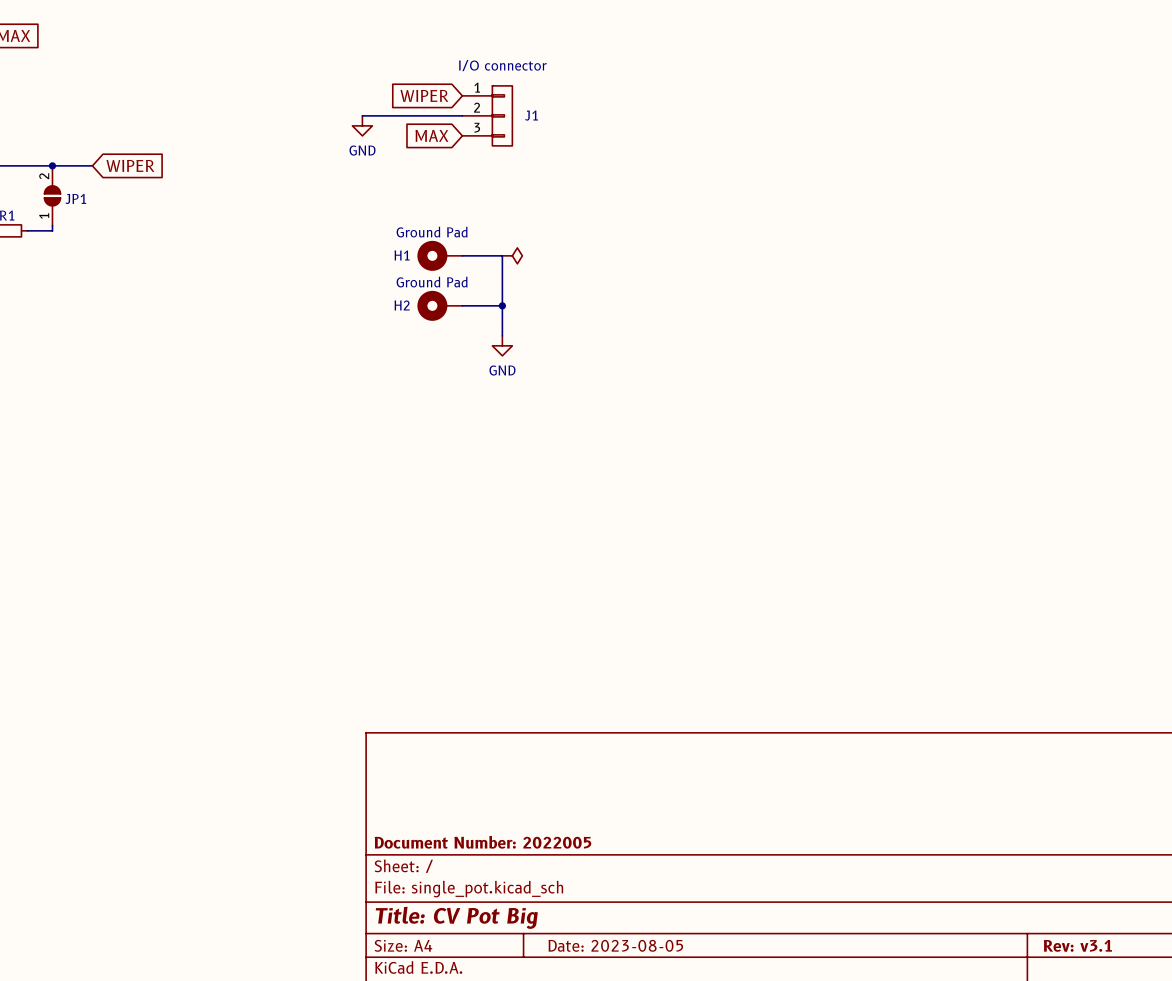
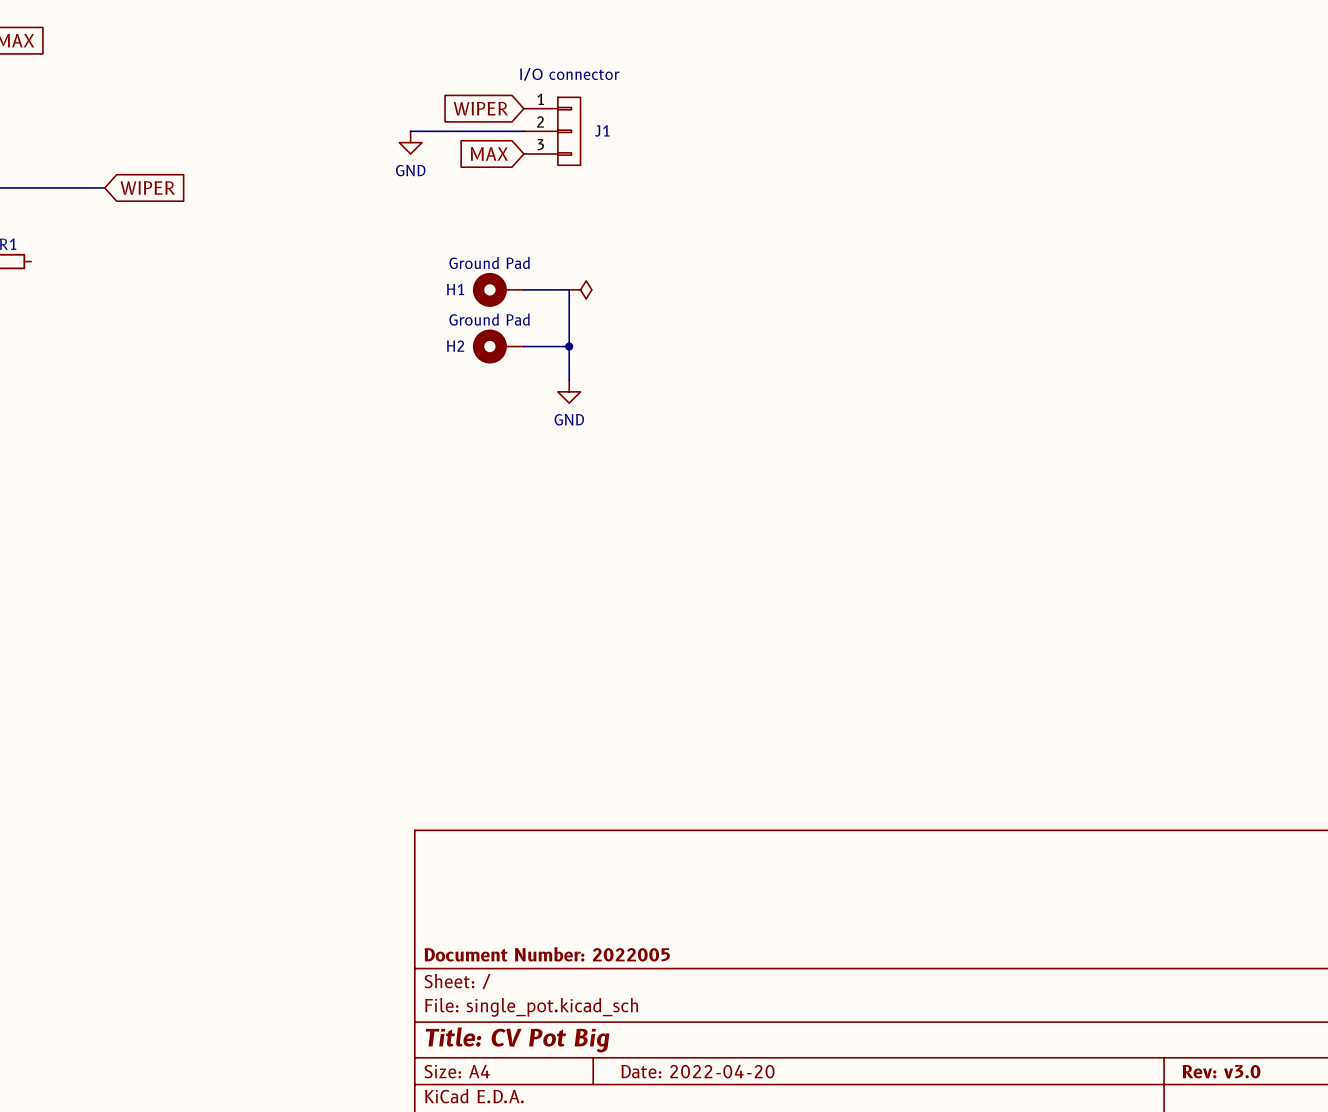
junction: (52, 165) -> none
JP1: (52, 195) -> none
wire: (52, 225) (52, 230) (27, 230) -> none
title block: Date: 2023-08-05 (615, 945) -> Date: 2022-04-20 (697, 1071)
title block: Rev: v3.1 (1077, 945) -> Rev: v3.0 (1221, 1071)

